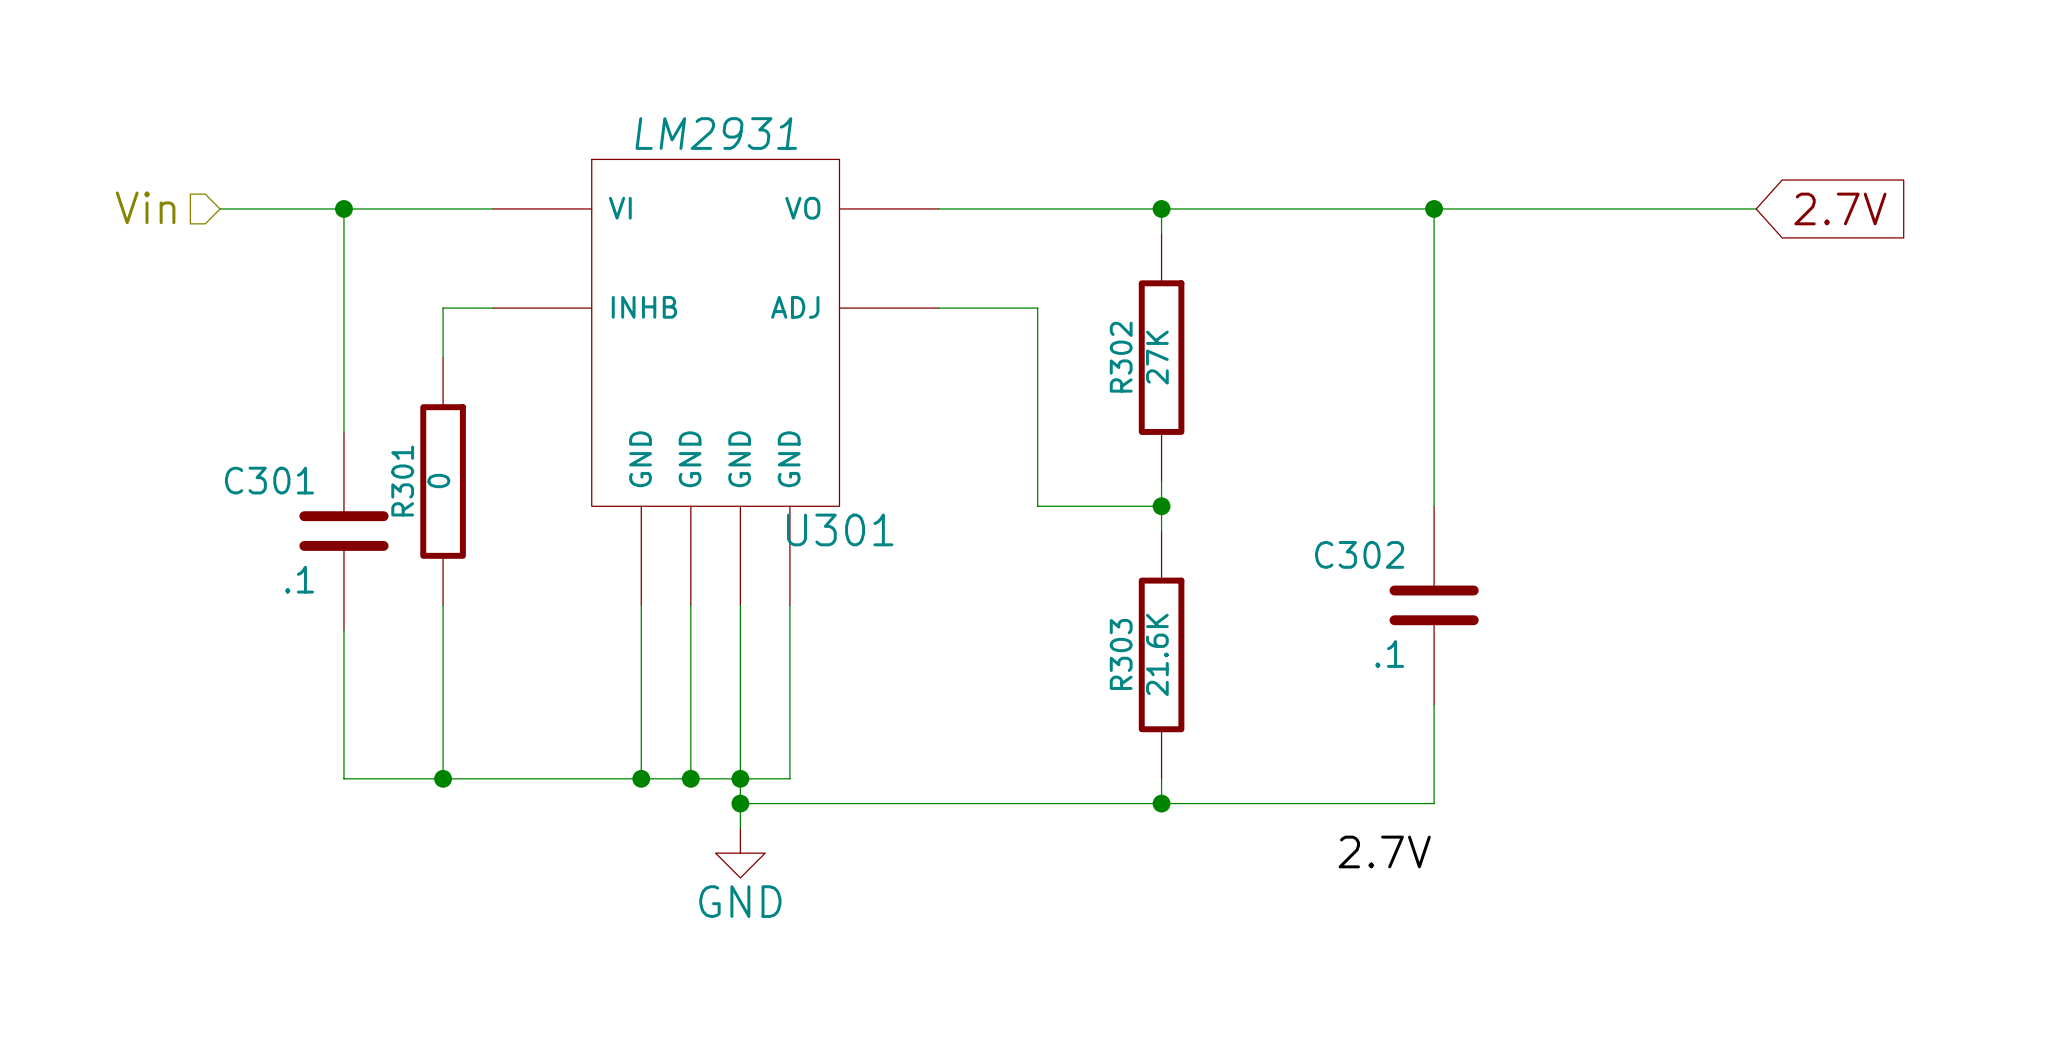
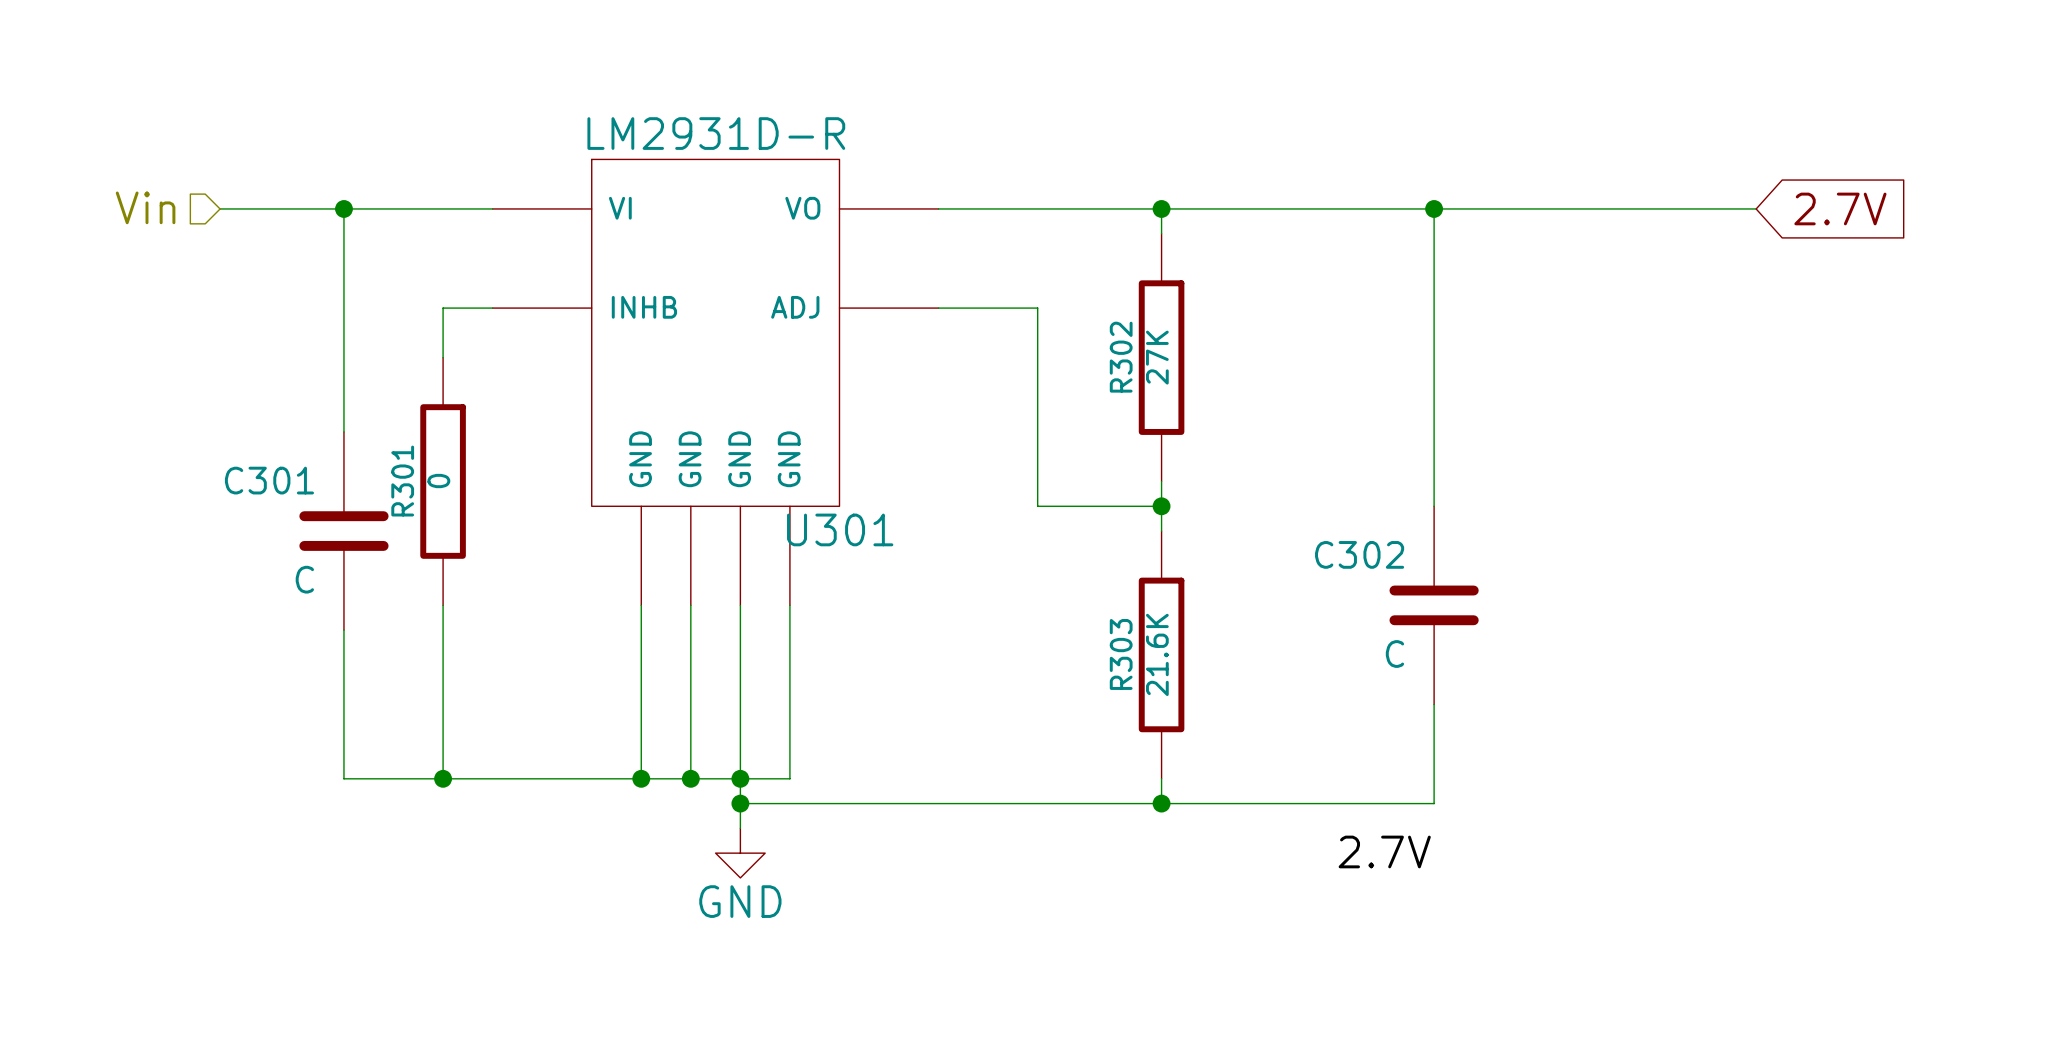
U301 value: LM2931 (716, 133) -> LM2931D-R (716, 133)
C301 value: .1 (299, 579) -> C (304, 579)
C302 value: .1 (1389, 654) -> C (1394, 654)

